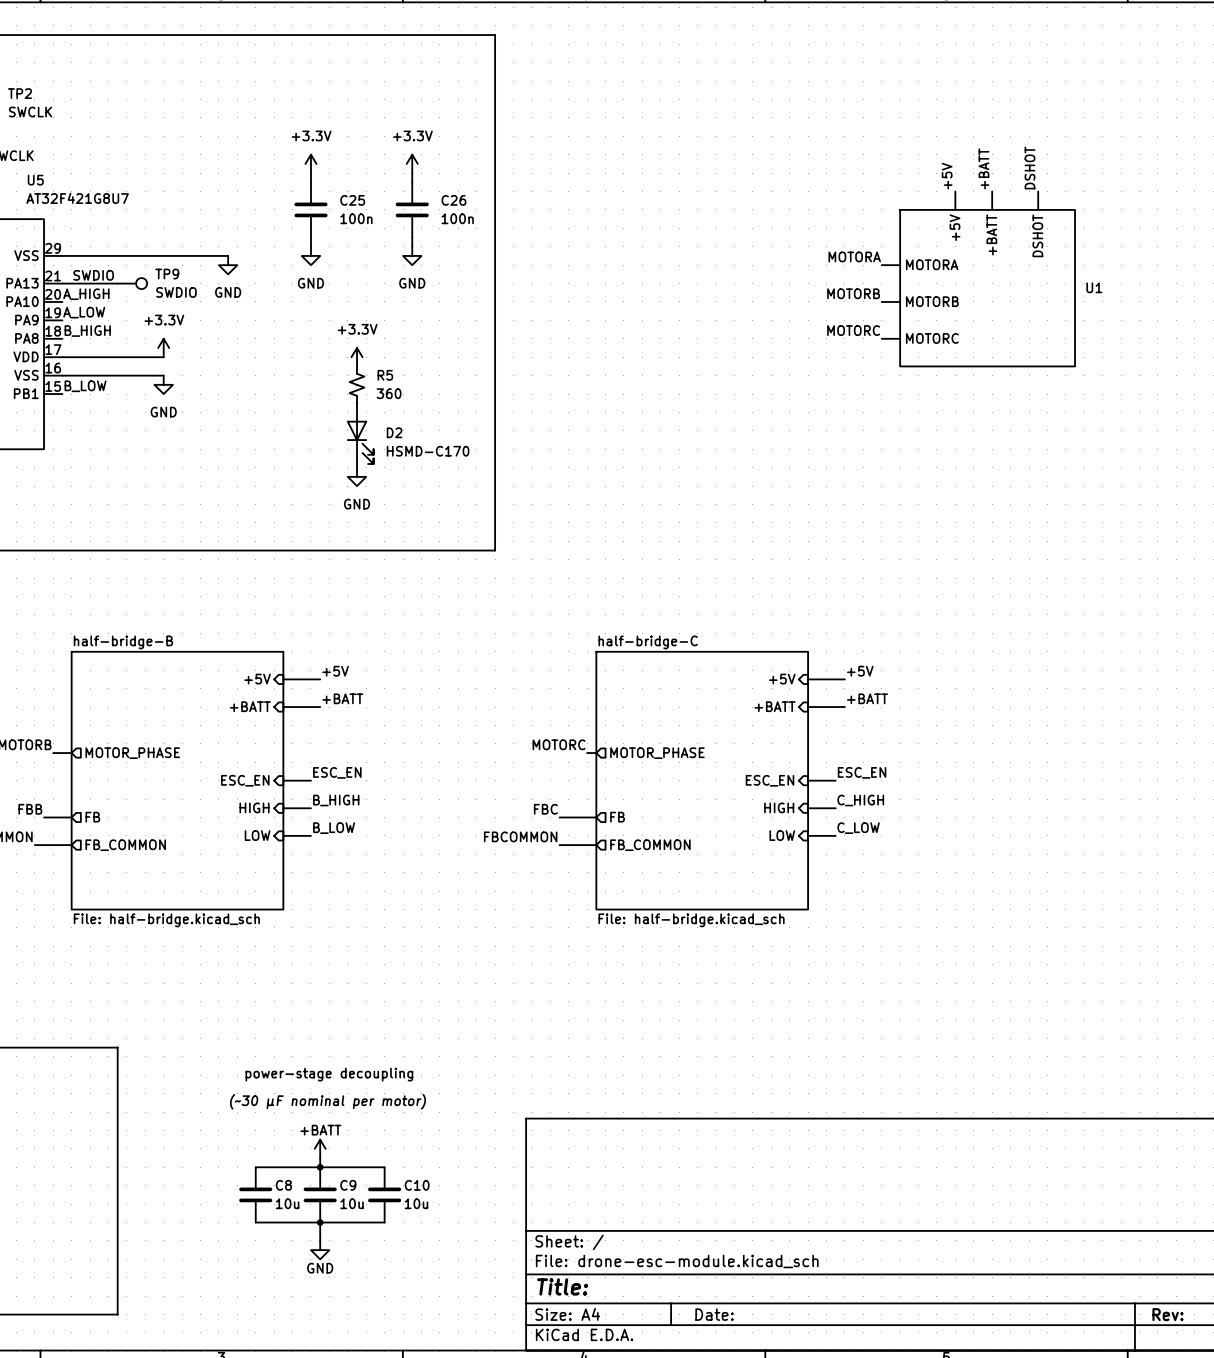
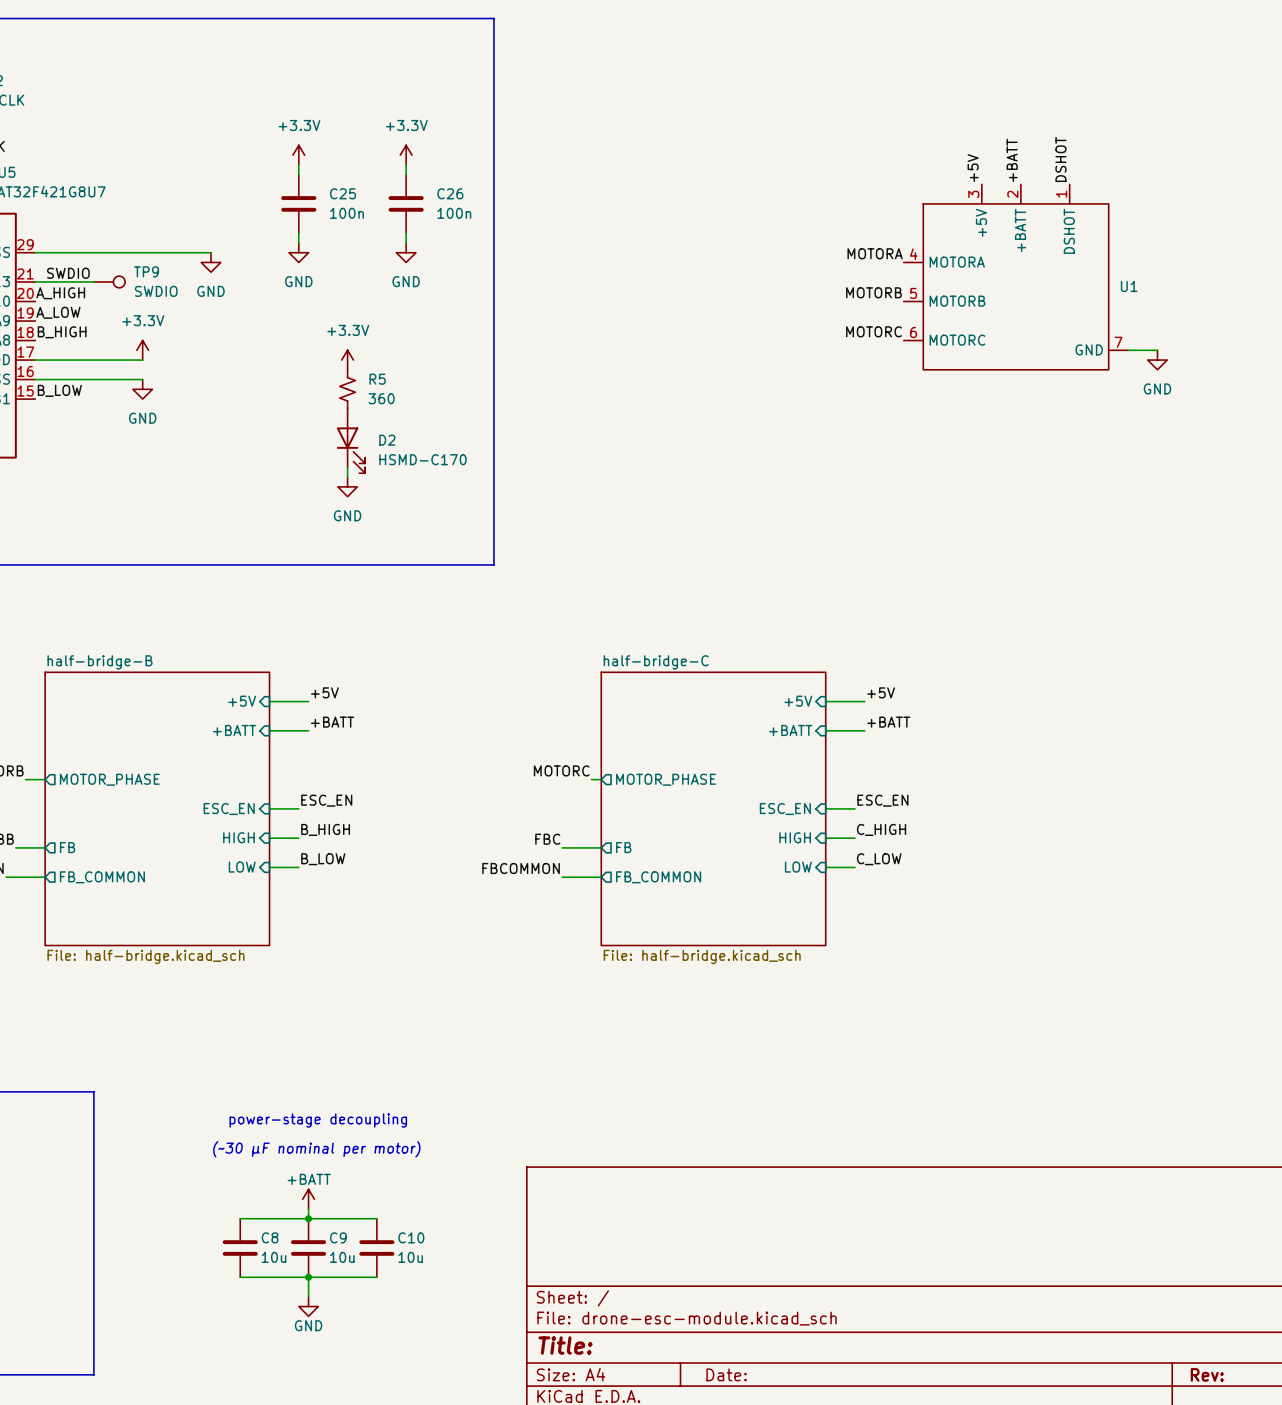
U1 symbol: [881, 191, 1076, 367] -> [903, 184, 1129, 370]
wire: none -> (1128, 350) (1157, 350)
power symbol: none -> GND (1157, 360)

